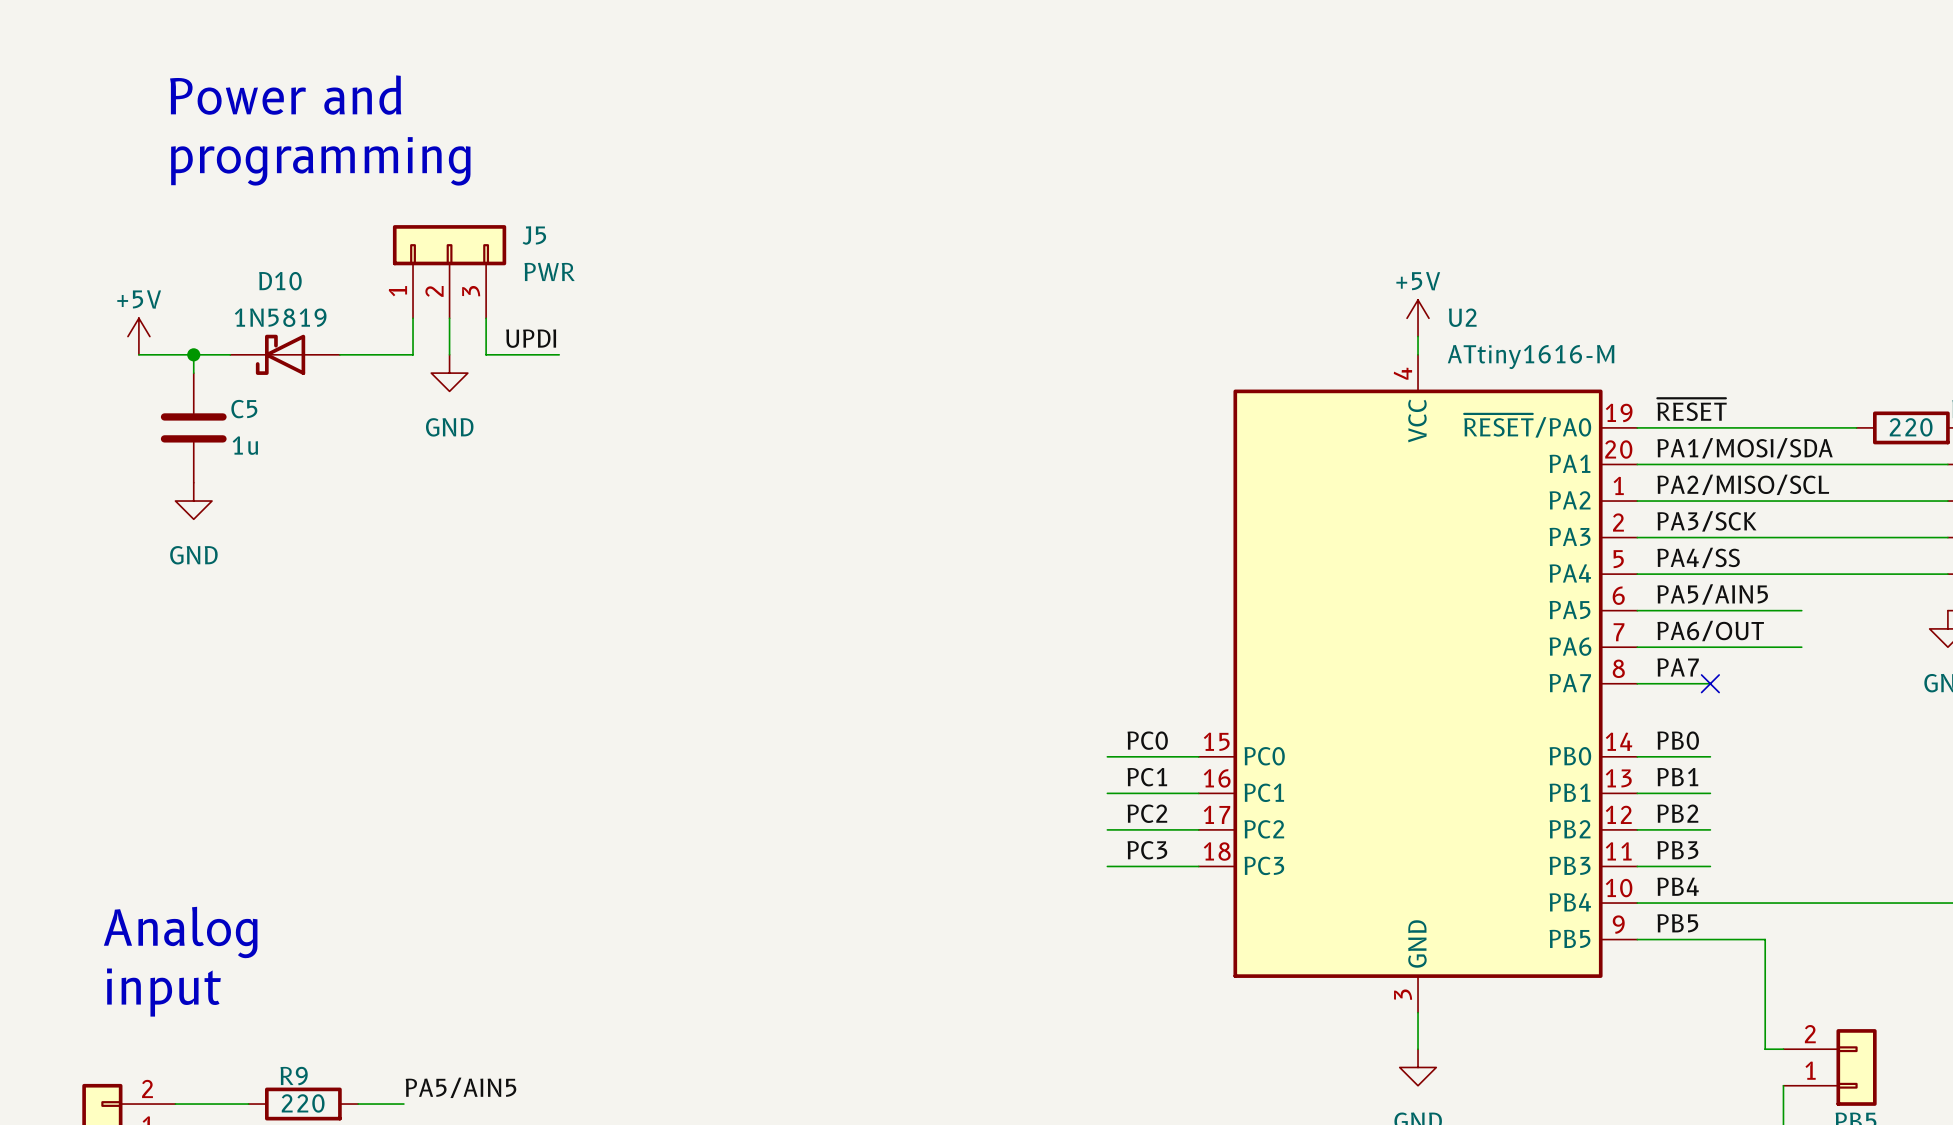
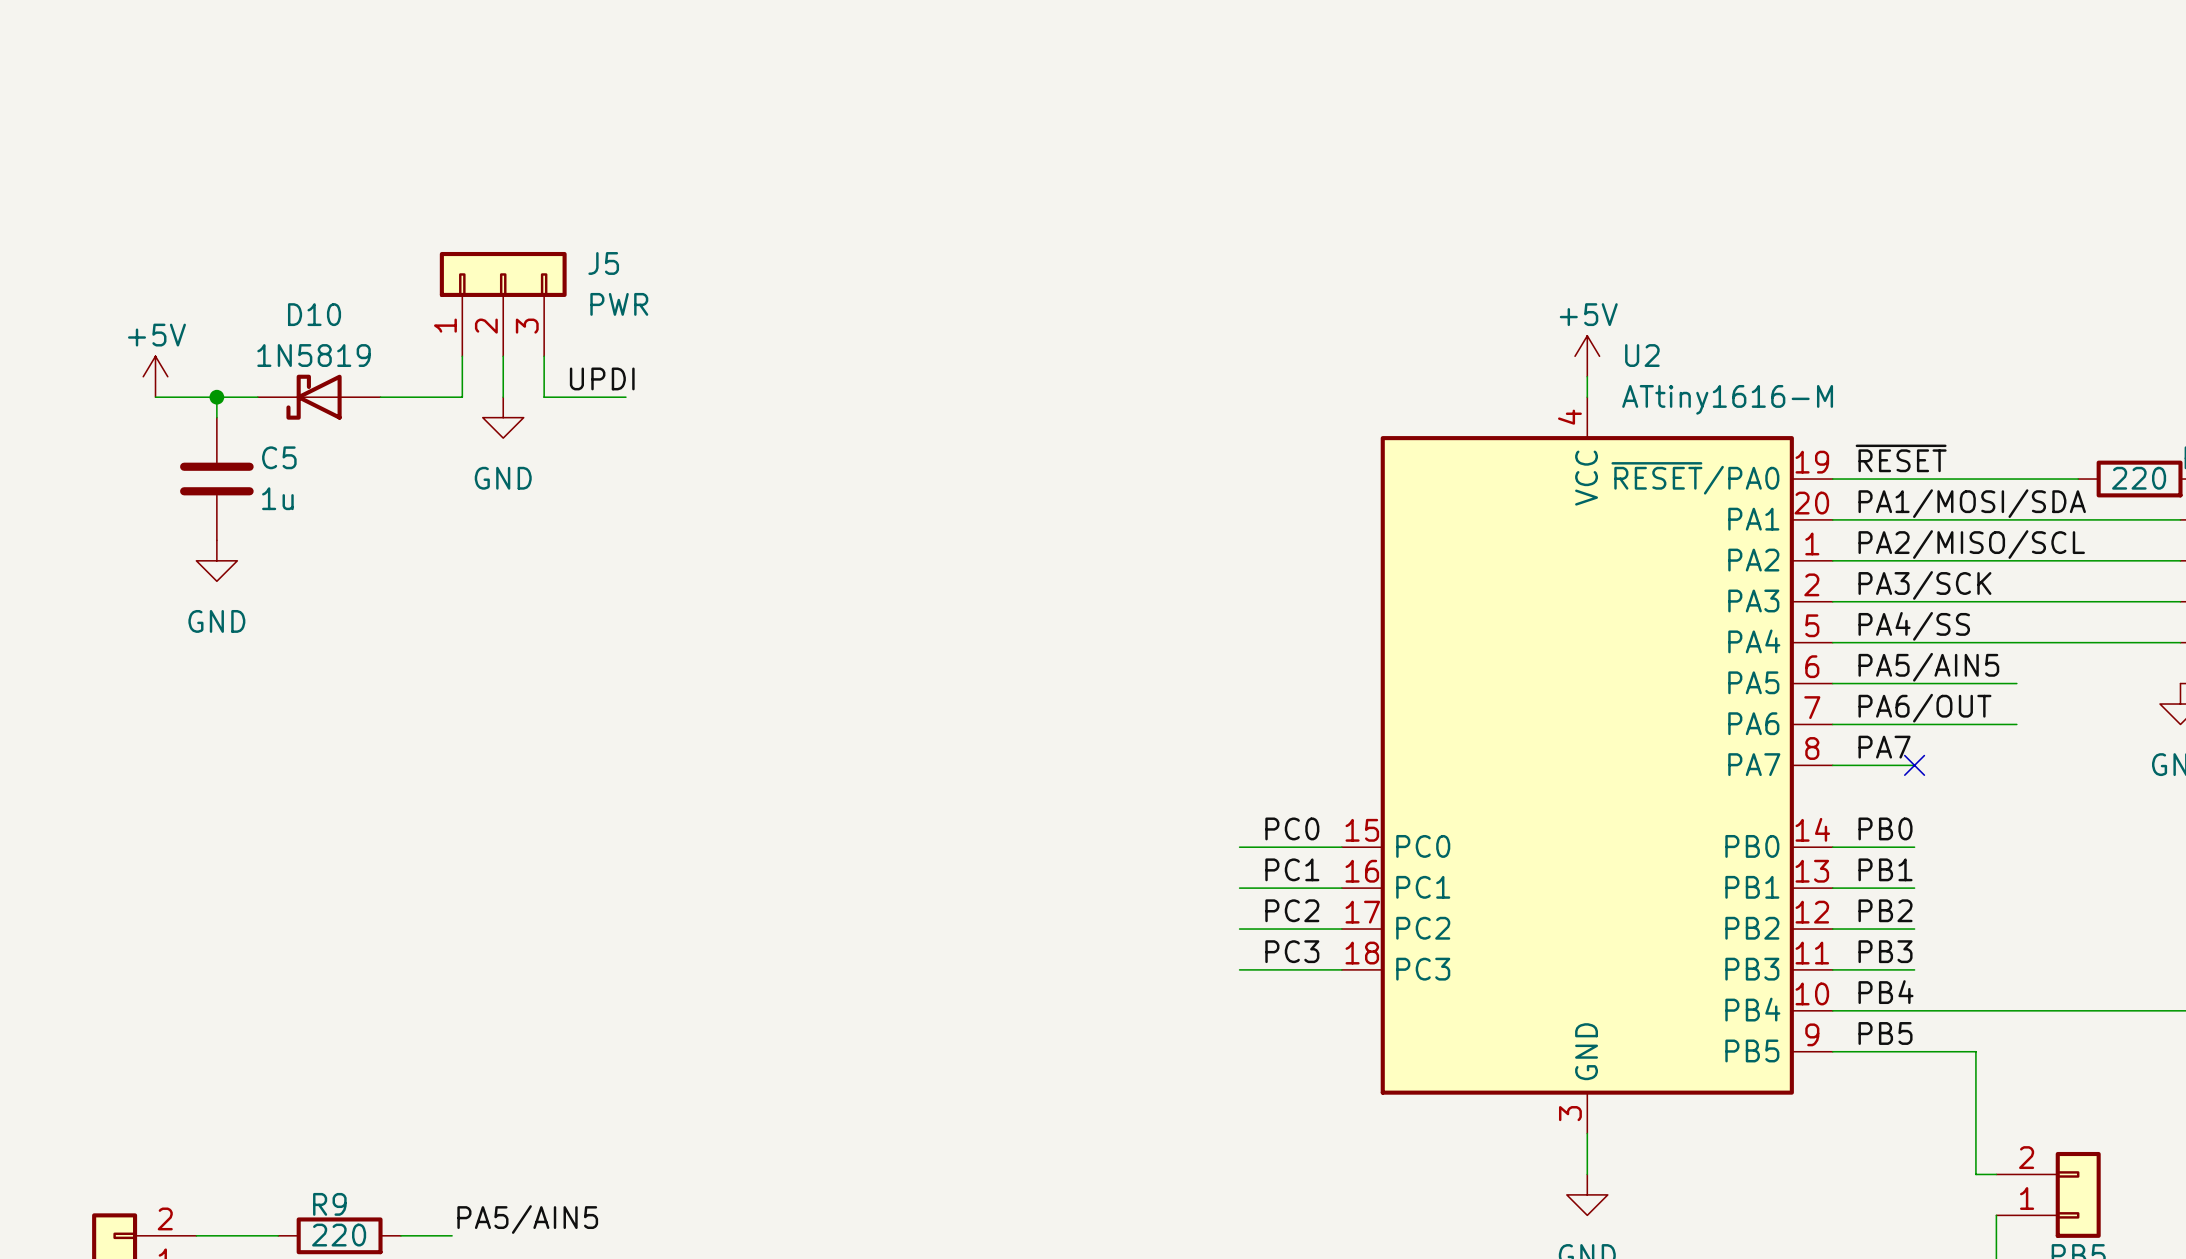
text: Power and (285, 95) -> none
text: programming (320, 161) -> none
text: Analog (180, 932) -> none
text: input (163, 992) -> none

